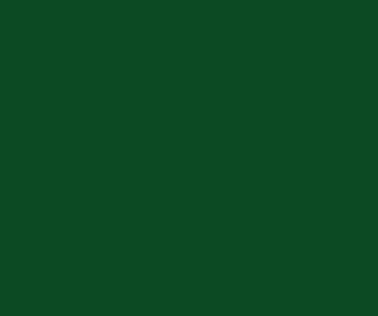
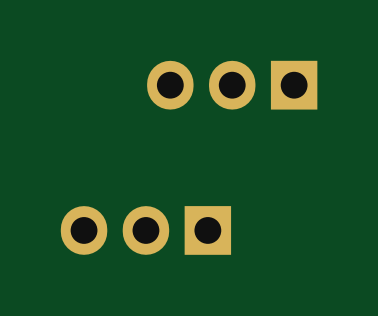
part: none -> (232, 85)
part: none -> (145, 230)

